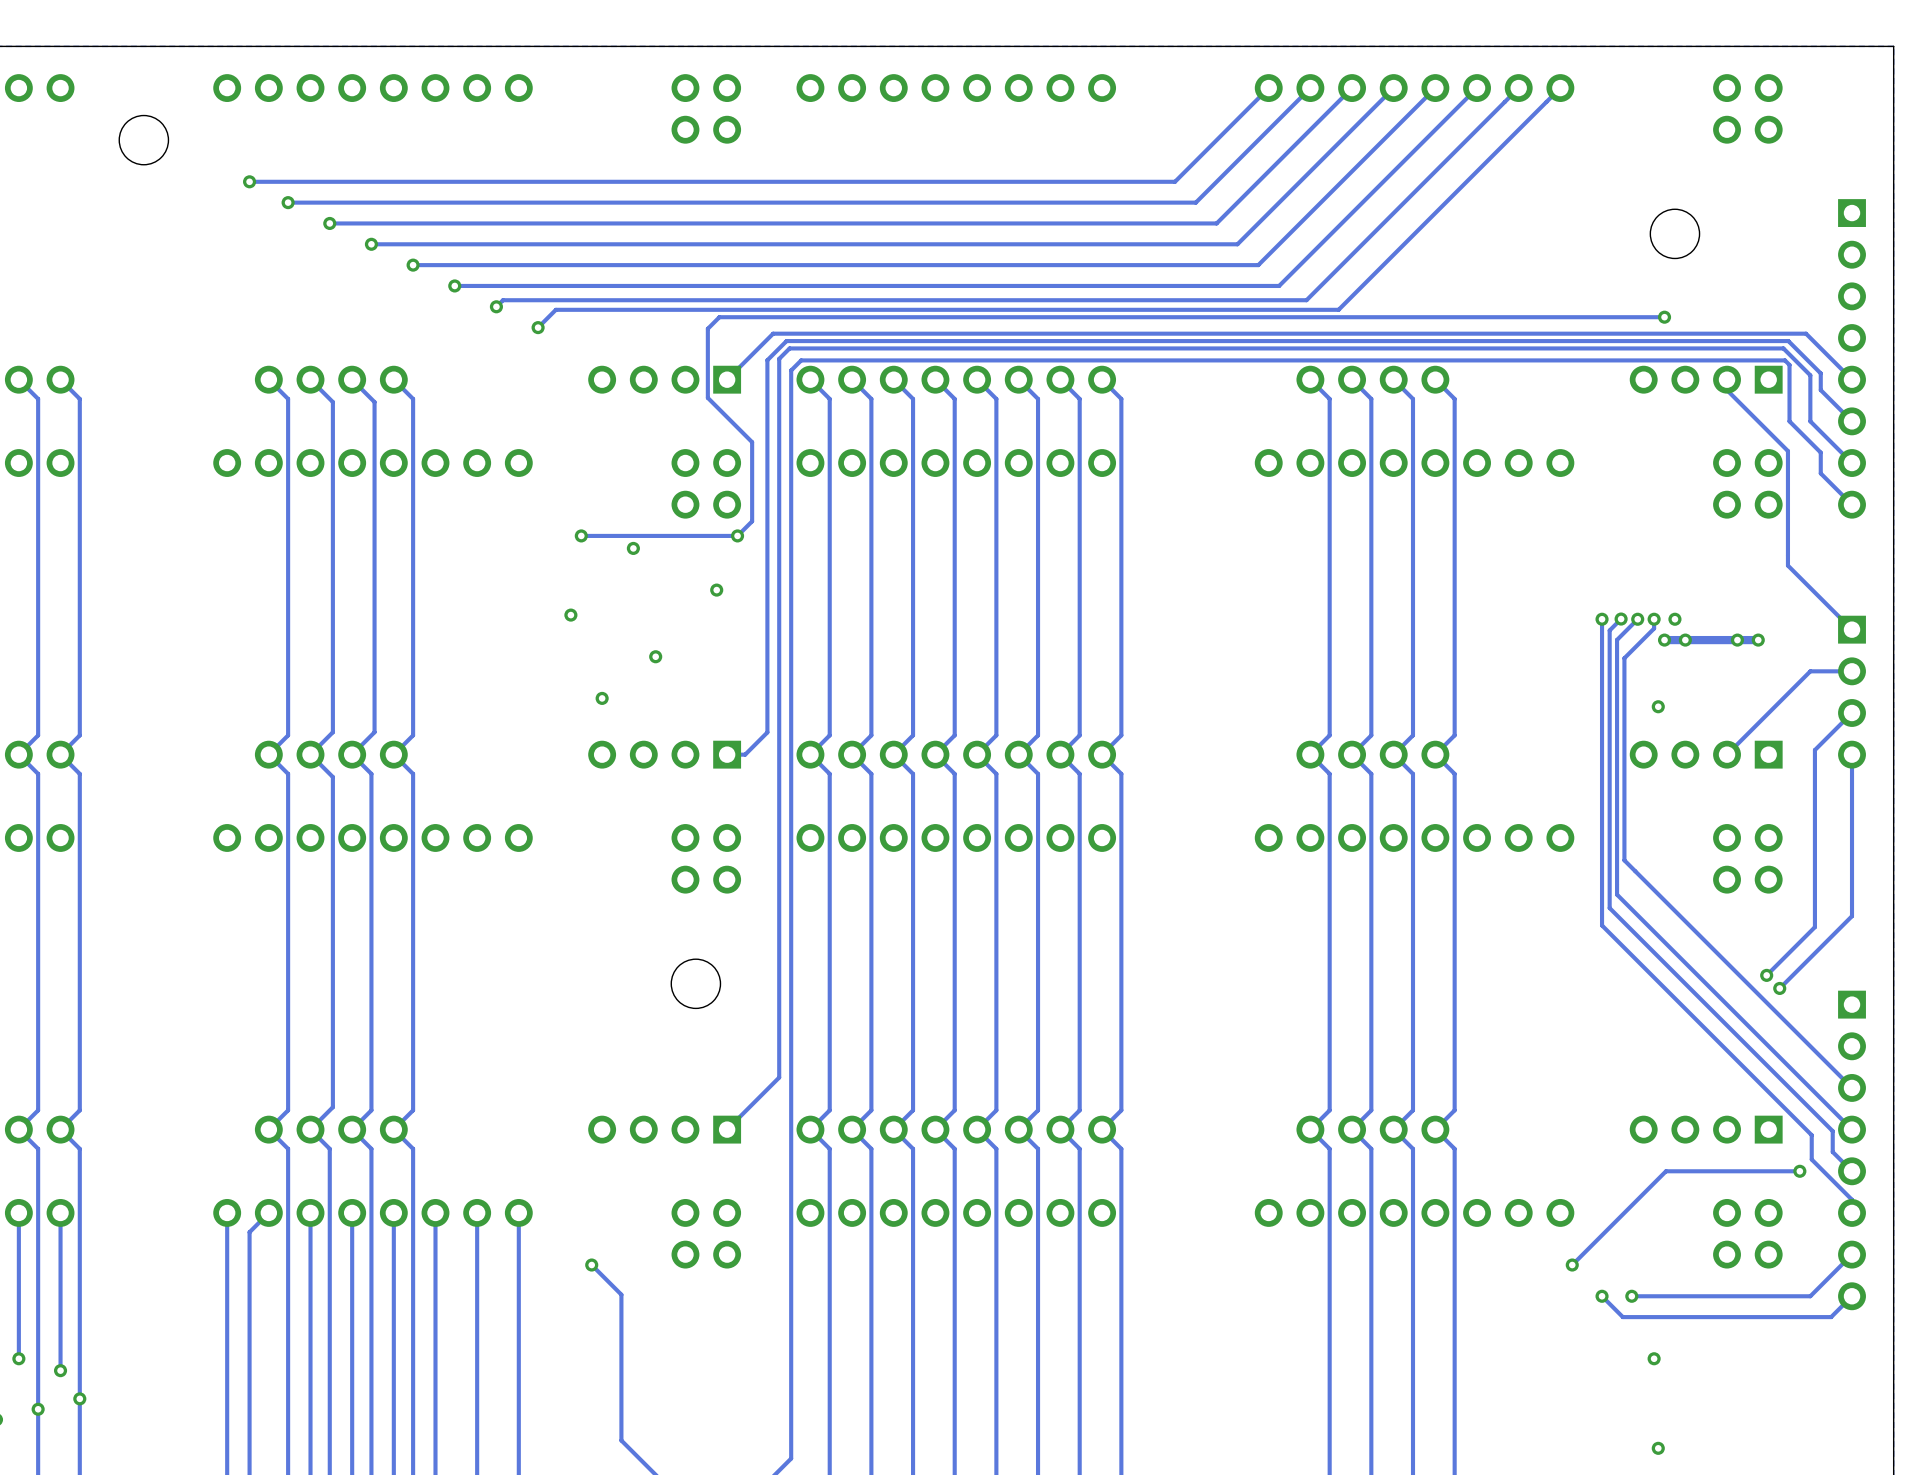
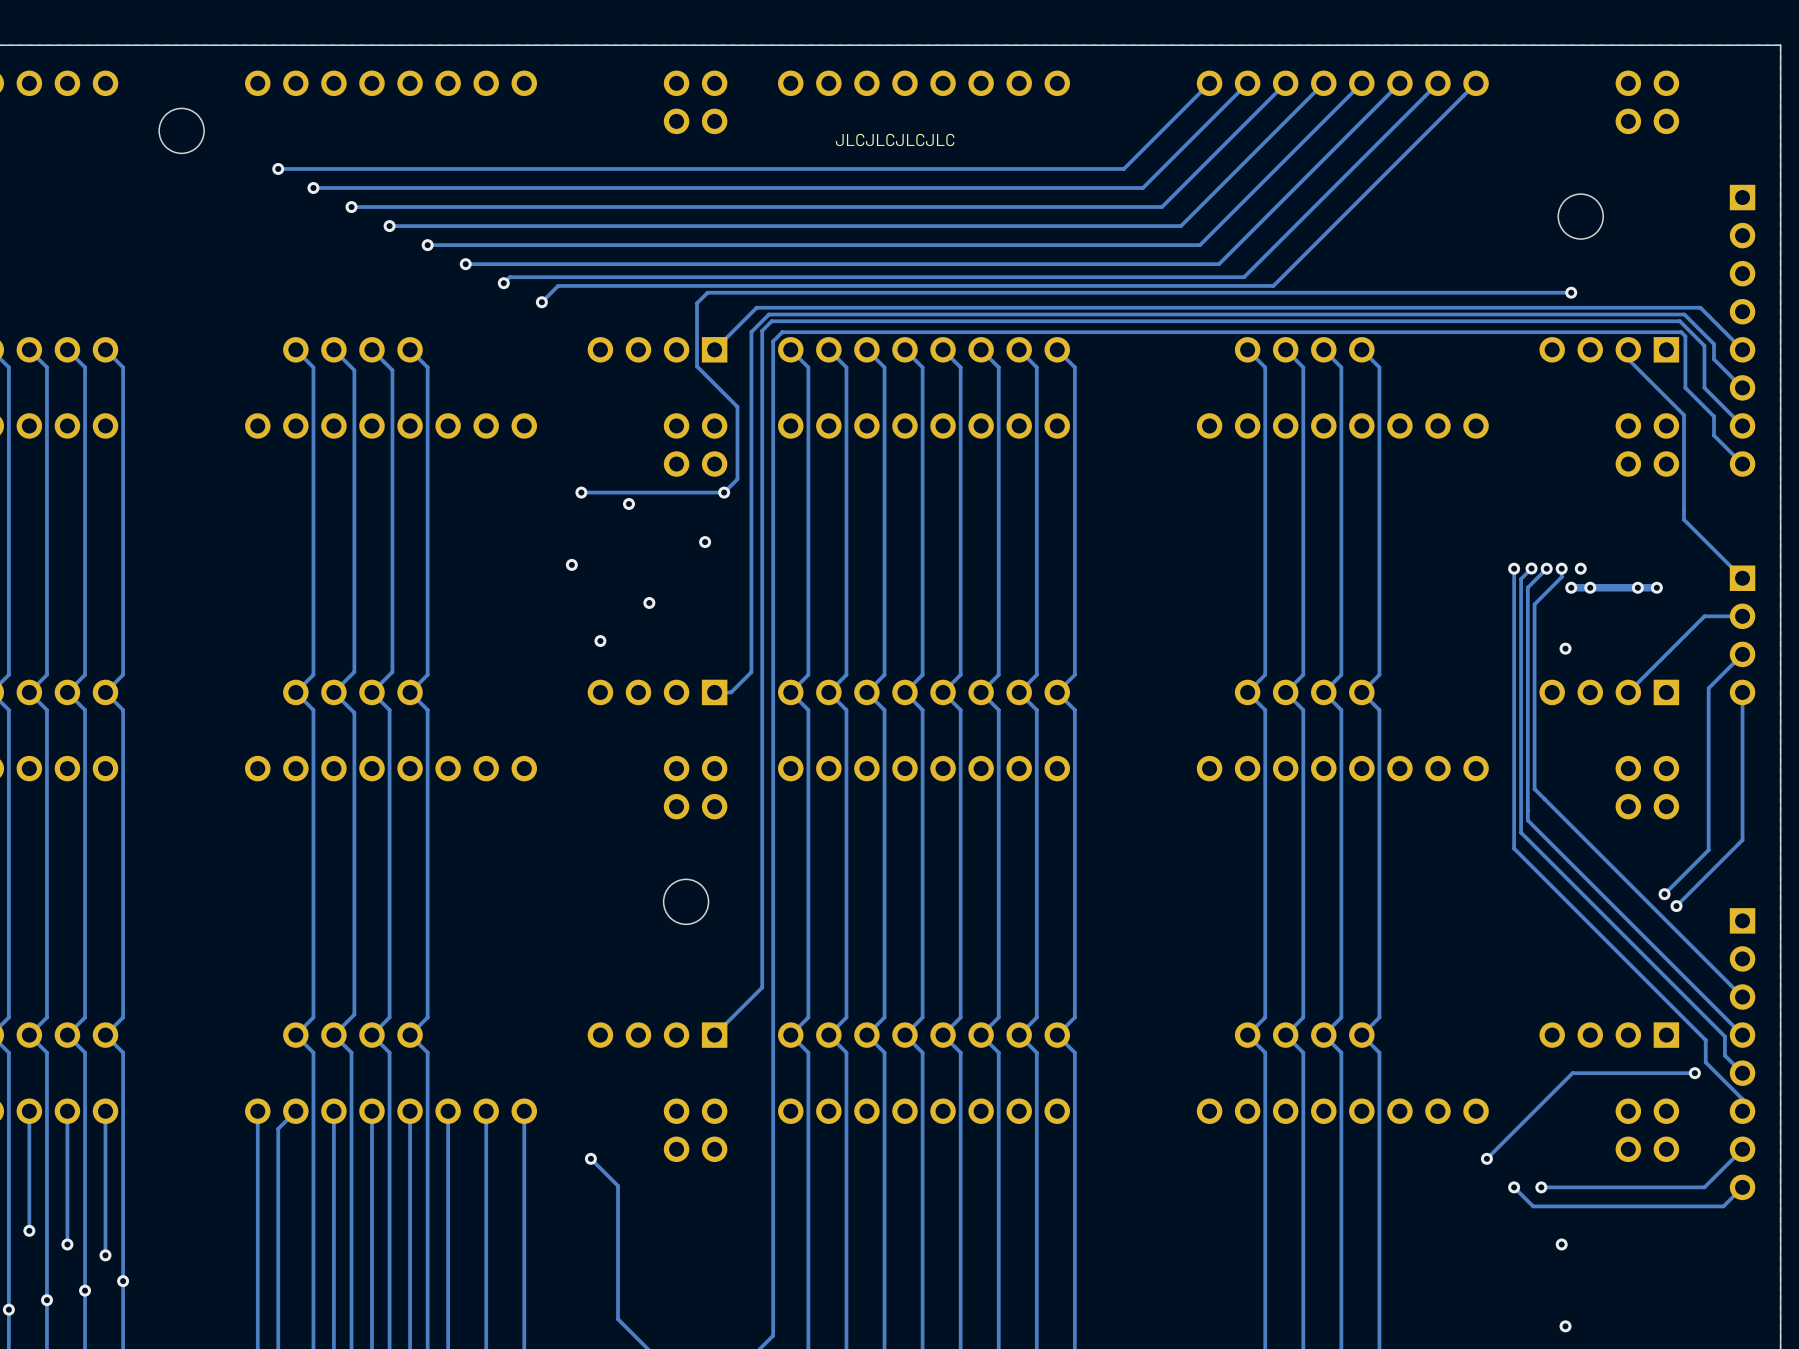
text: none -> JLCJLCJLCJLC (895, 139)

